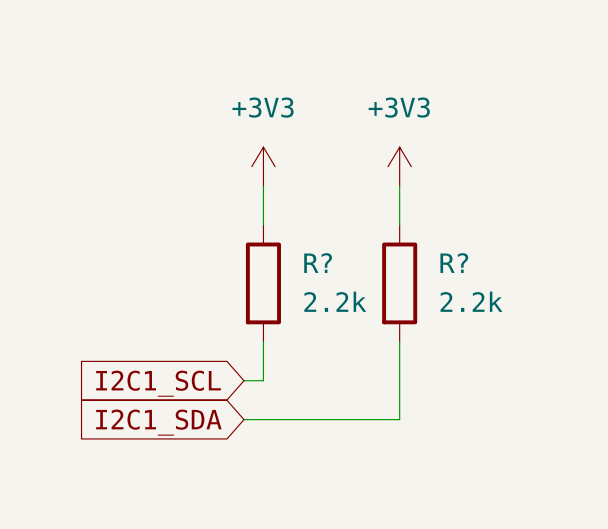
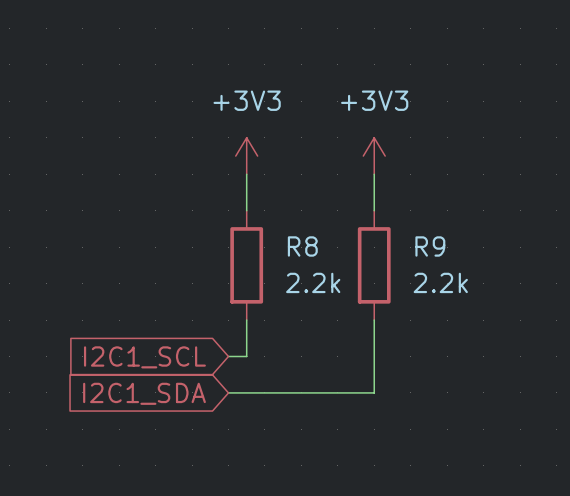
R? name: R? (318, 263) -> R8 (302, 246)
R? name: R? (454, 263) -> R9 (430, 246)

